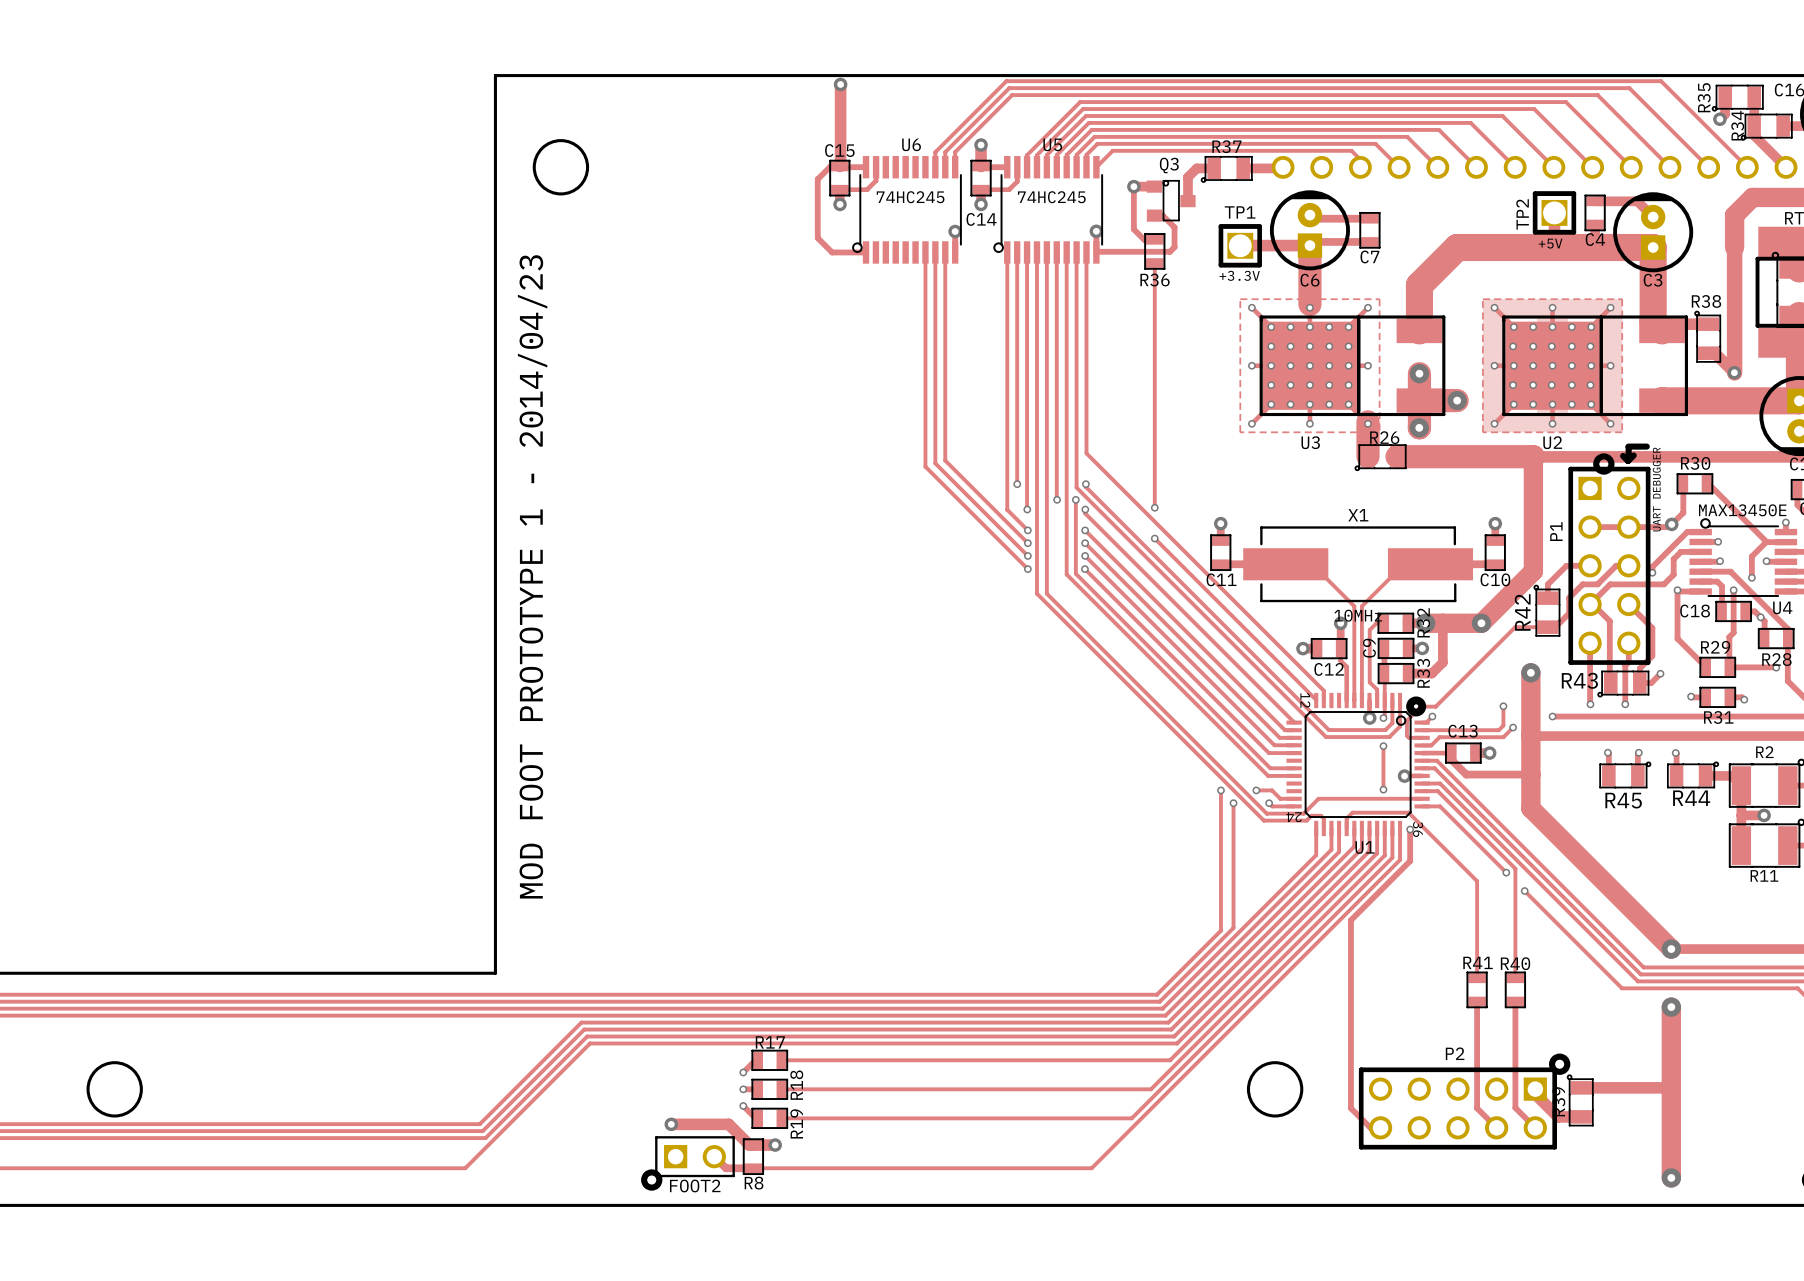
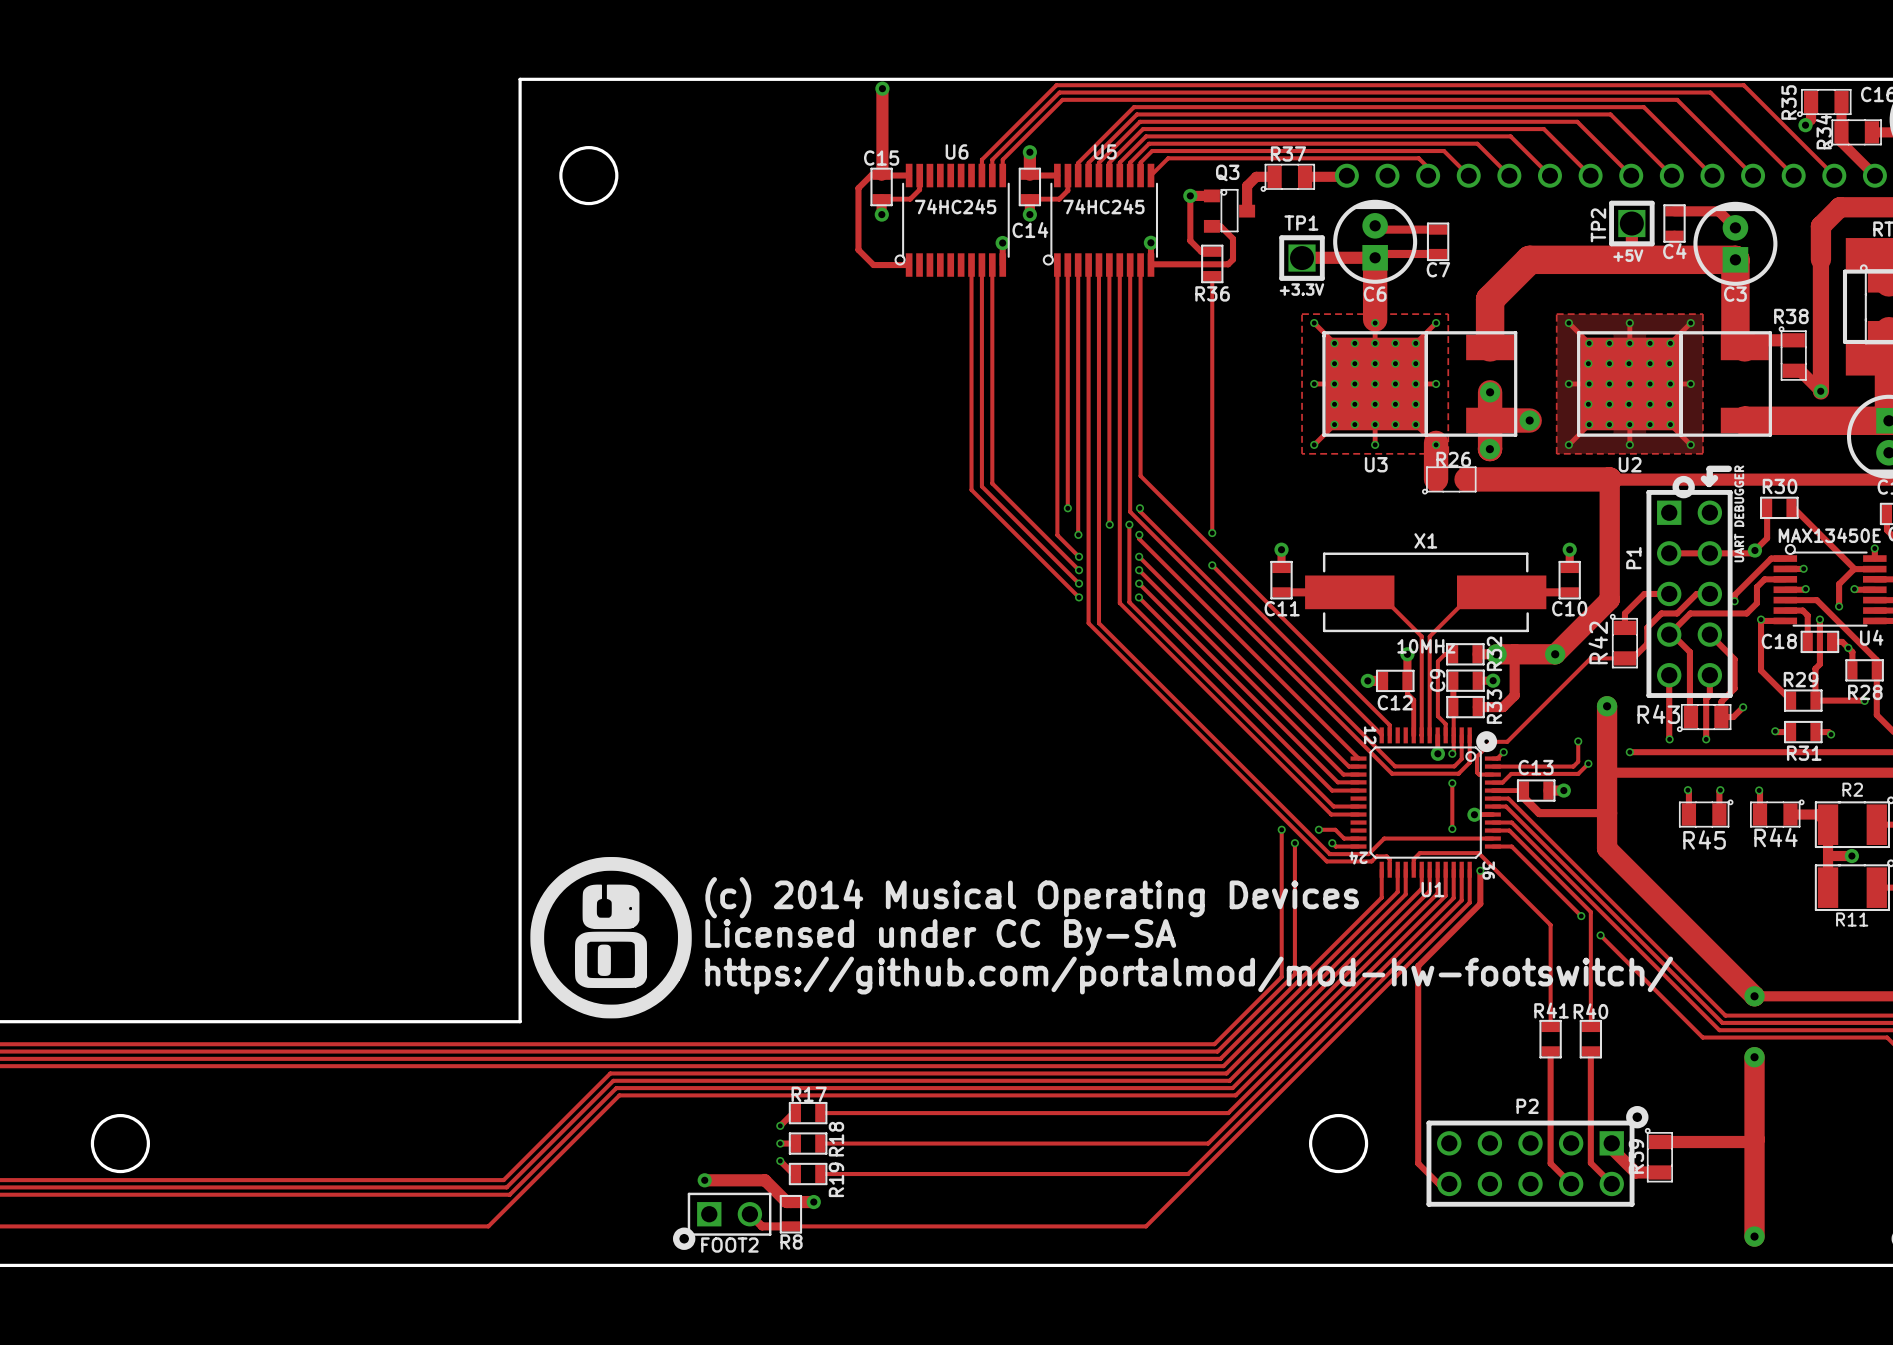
text: MOD FOOT PROTOTYPE 1 - 2014/04/23 (532, 576) -> none
drawing: none -> [530, 857, 692, 1019]
text: none -> (c) 2014 Musical Operating Devices (1032, 897)
text: none -> Licensed under CC By-SA (940, 937)
text: none -> https://github.com/portalmod/mod-hw-footswitch/ (1189, 975)

